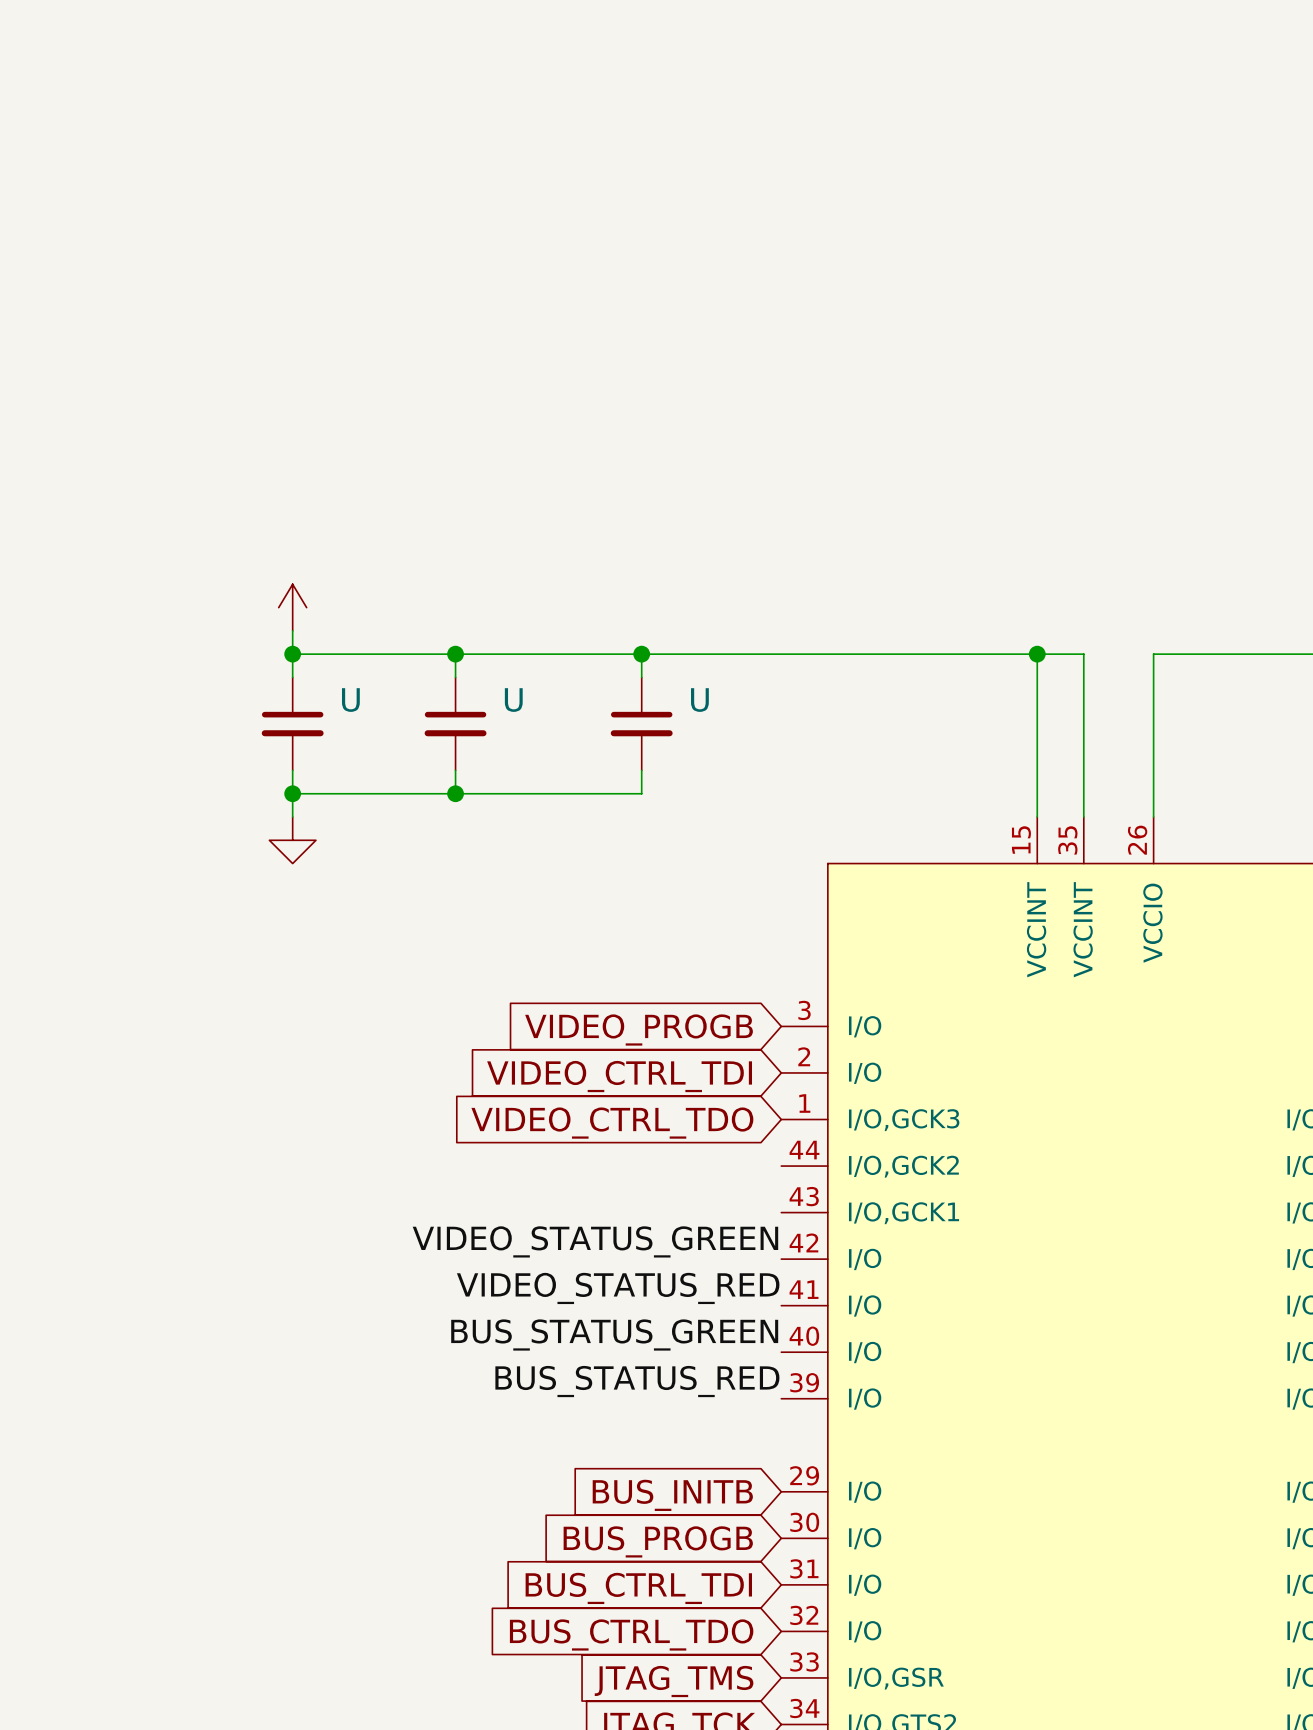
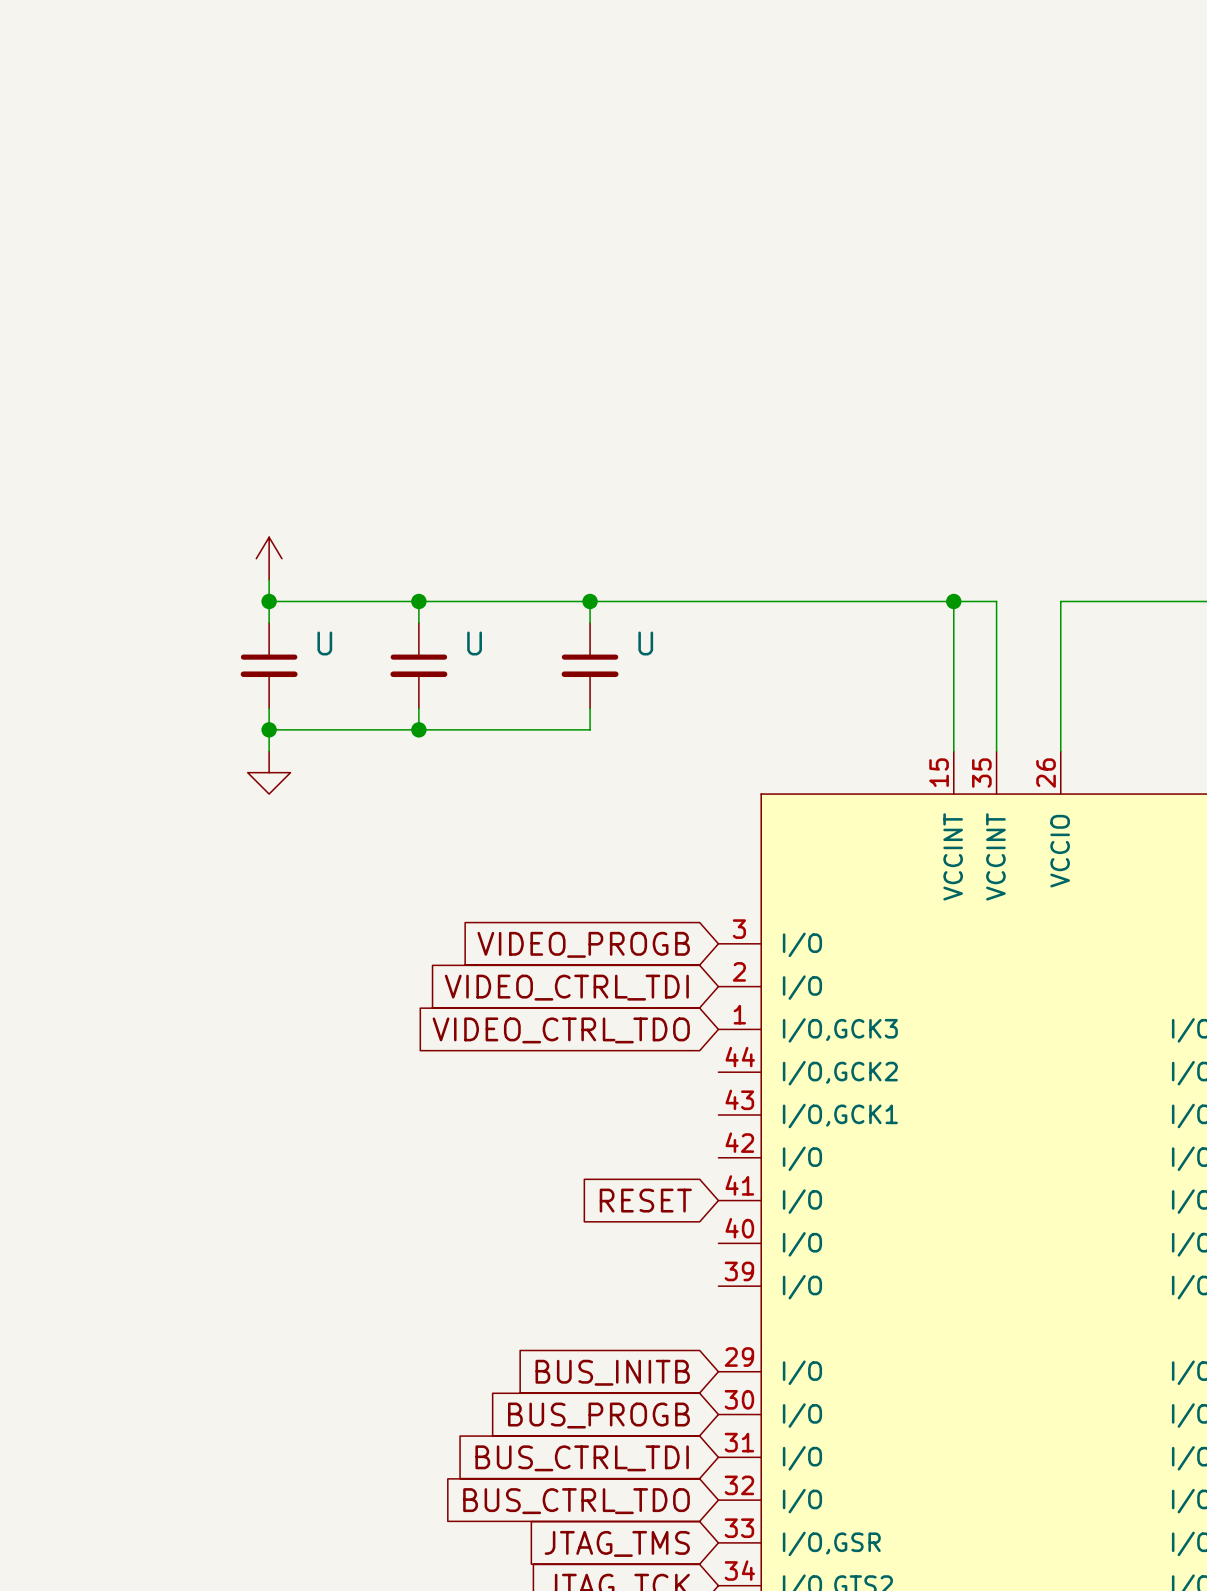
label: VIDEO_STATUS_GREEN (595, 1241) -> none
label: VIDEO_STATUS_RED (618, 1288) -> none
global label: none -> RESET (645, 1200)
label: BUS_STATUS_GREEN (614, 1334) -> none
label: BUS_STATUS_RED (637, 1381) -> none

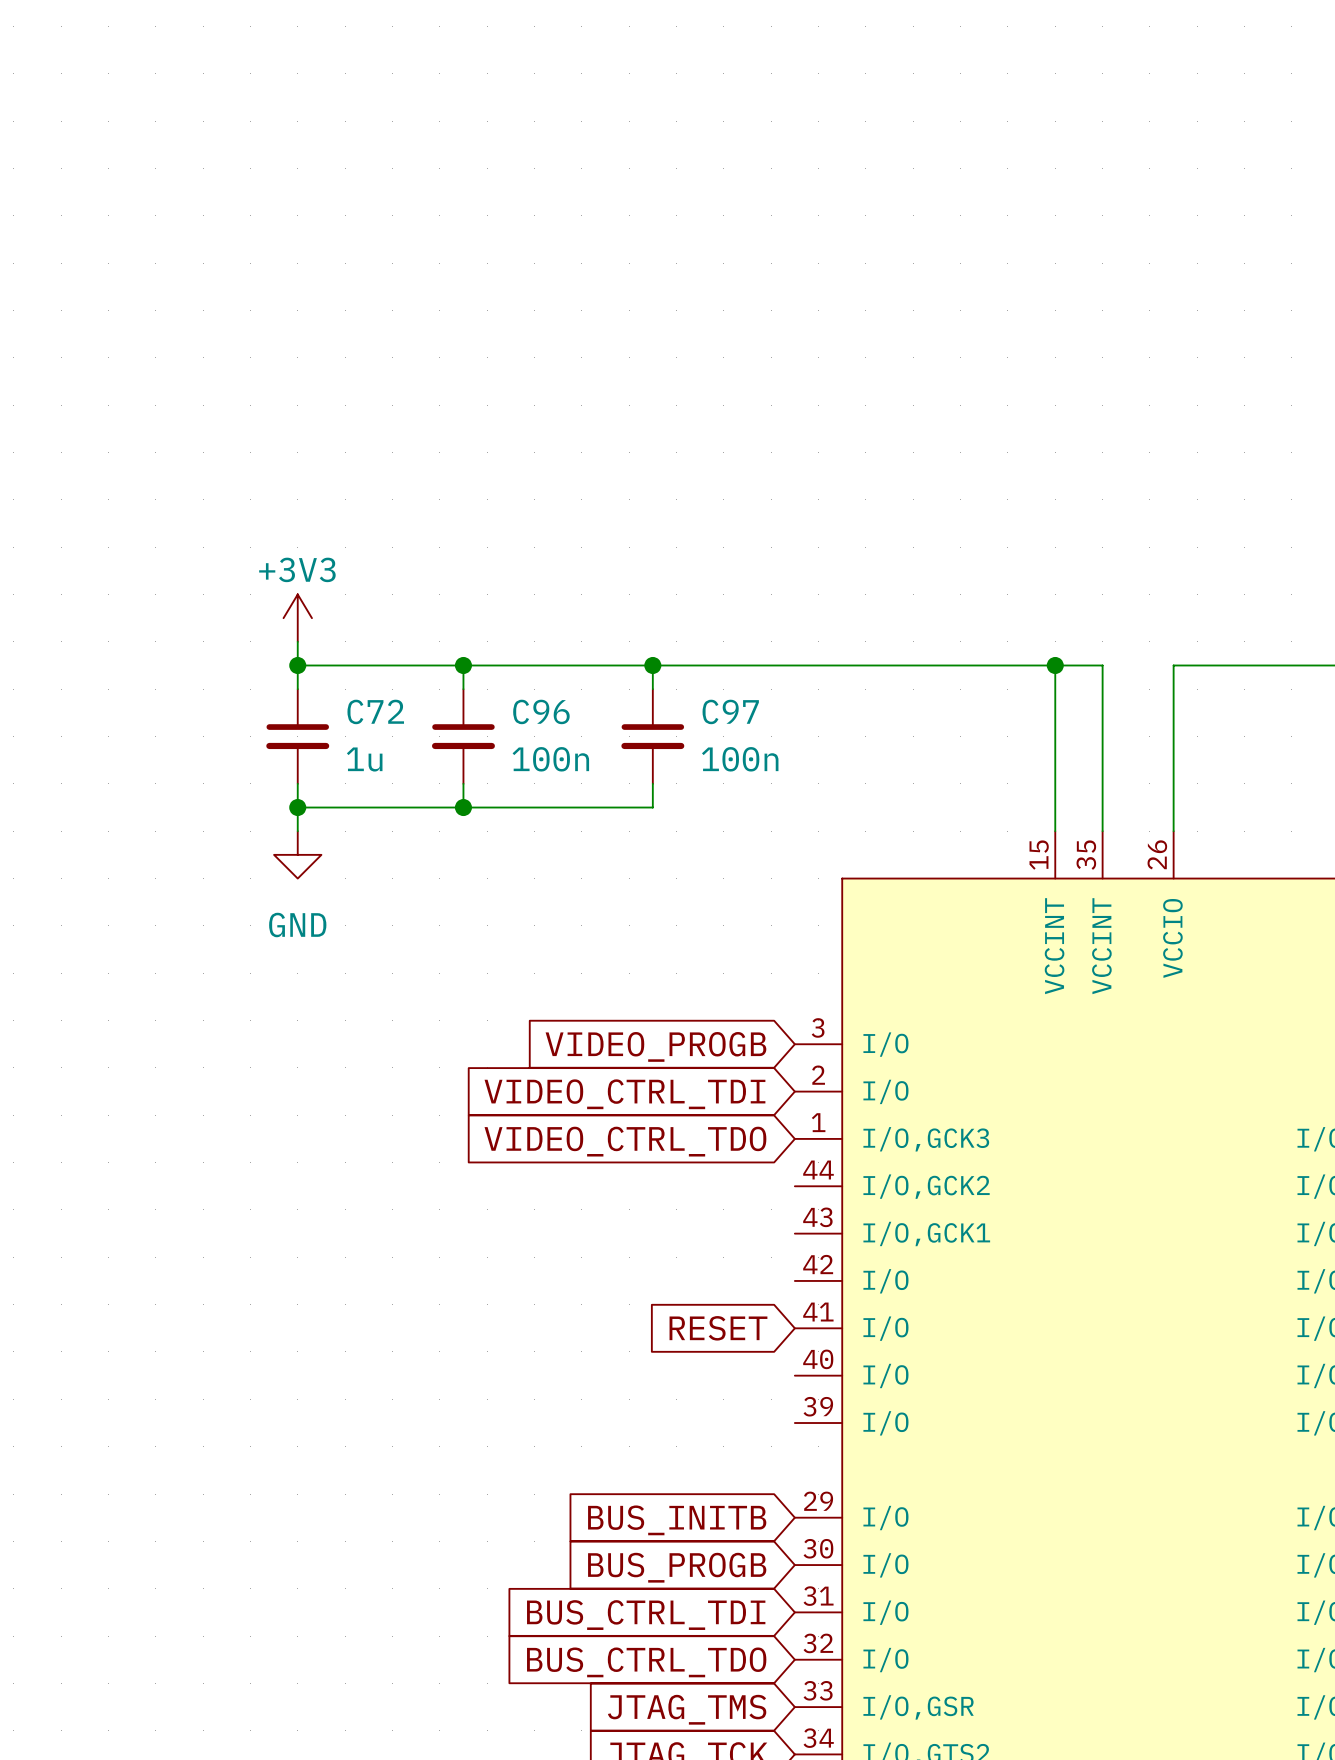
power symbol text: none -> +3V3 (297, 569)
U name: U (324, 643) -> C72 (375, 711)
U name: U (474, 643) -> C96 (541, 711)
U name: U (645, 643) -> C97 (730, 711)
U value: none -> 1u (364, 759)
U value: none -> 100n (550, 759)
U value: none -> 100n (740, 759)
power symbol text: none -> GND (297, 925)

